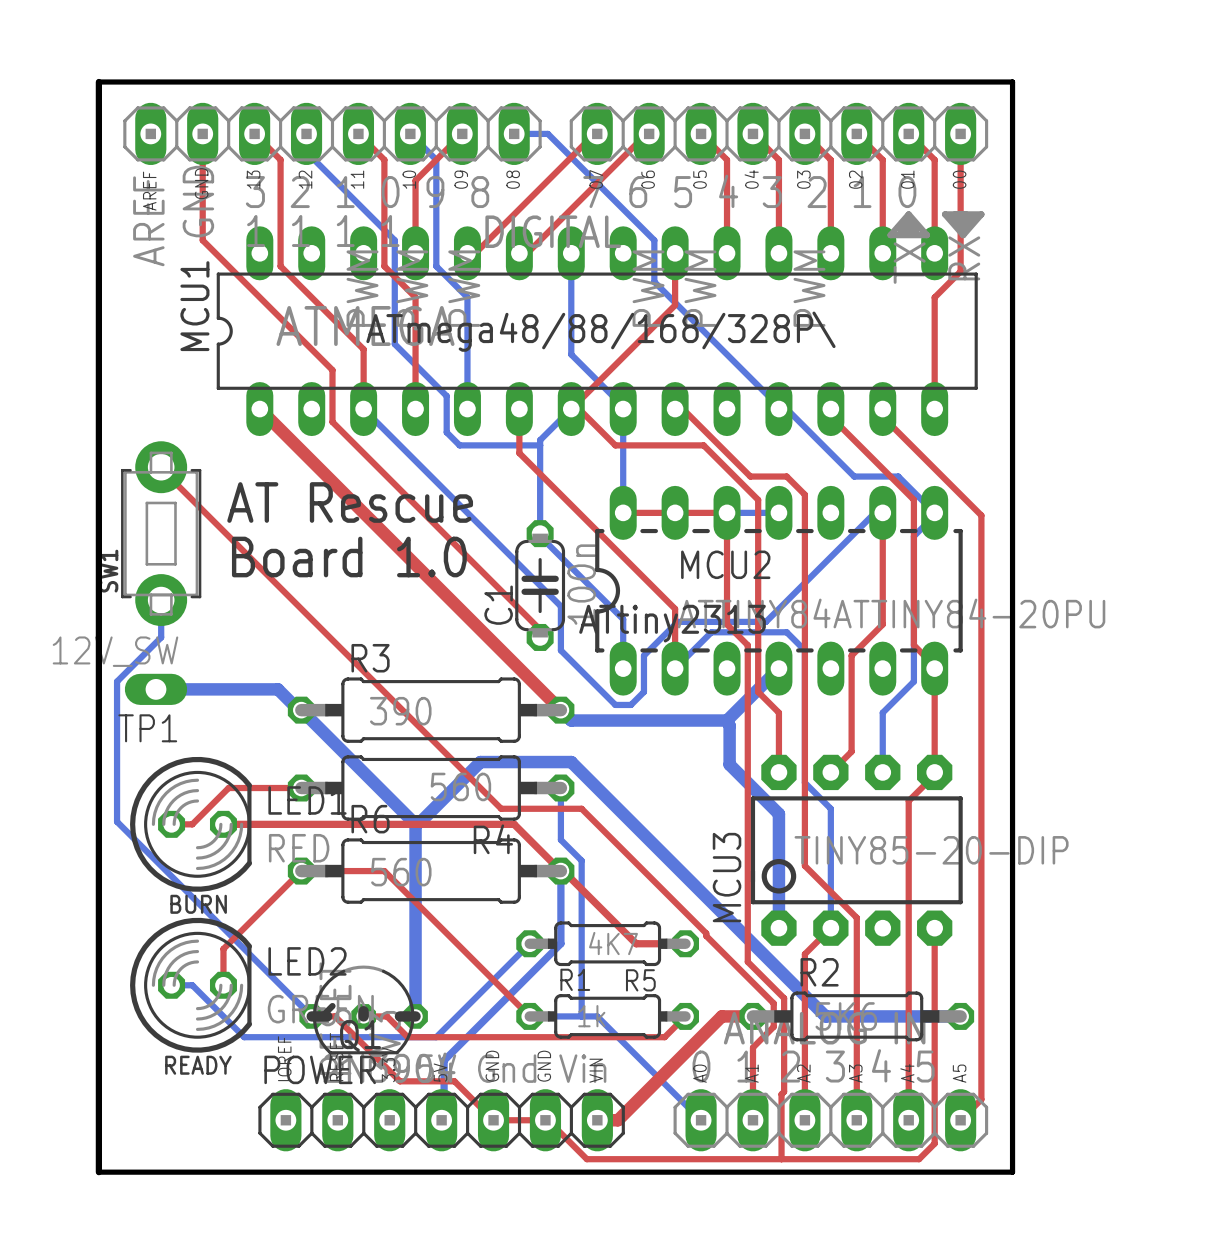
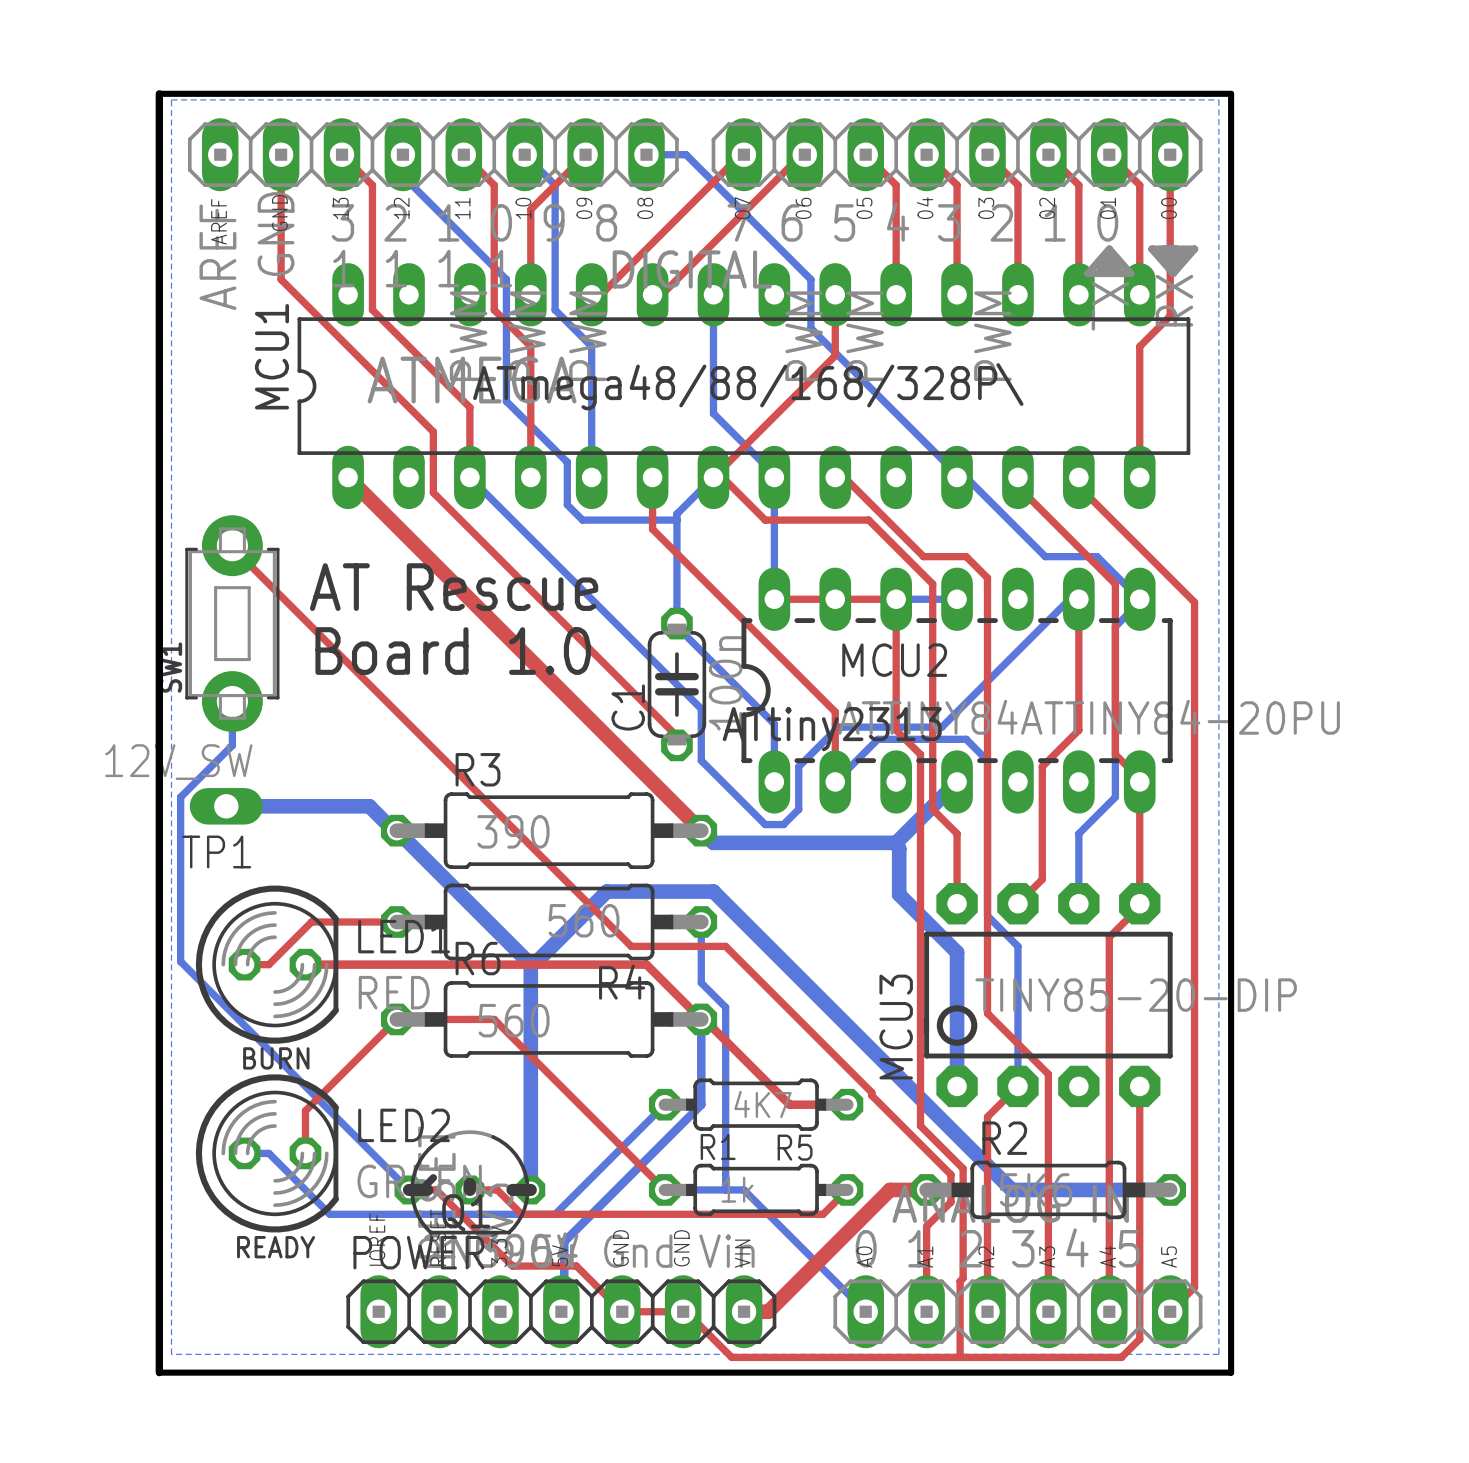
bottom zone outline: none -> (171, 99) (1218, 99) (1218, 1354) (171, 1354) (171, 99)

